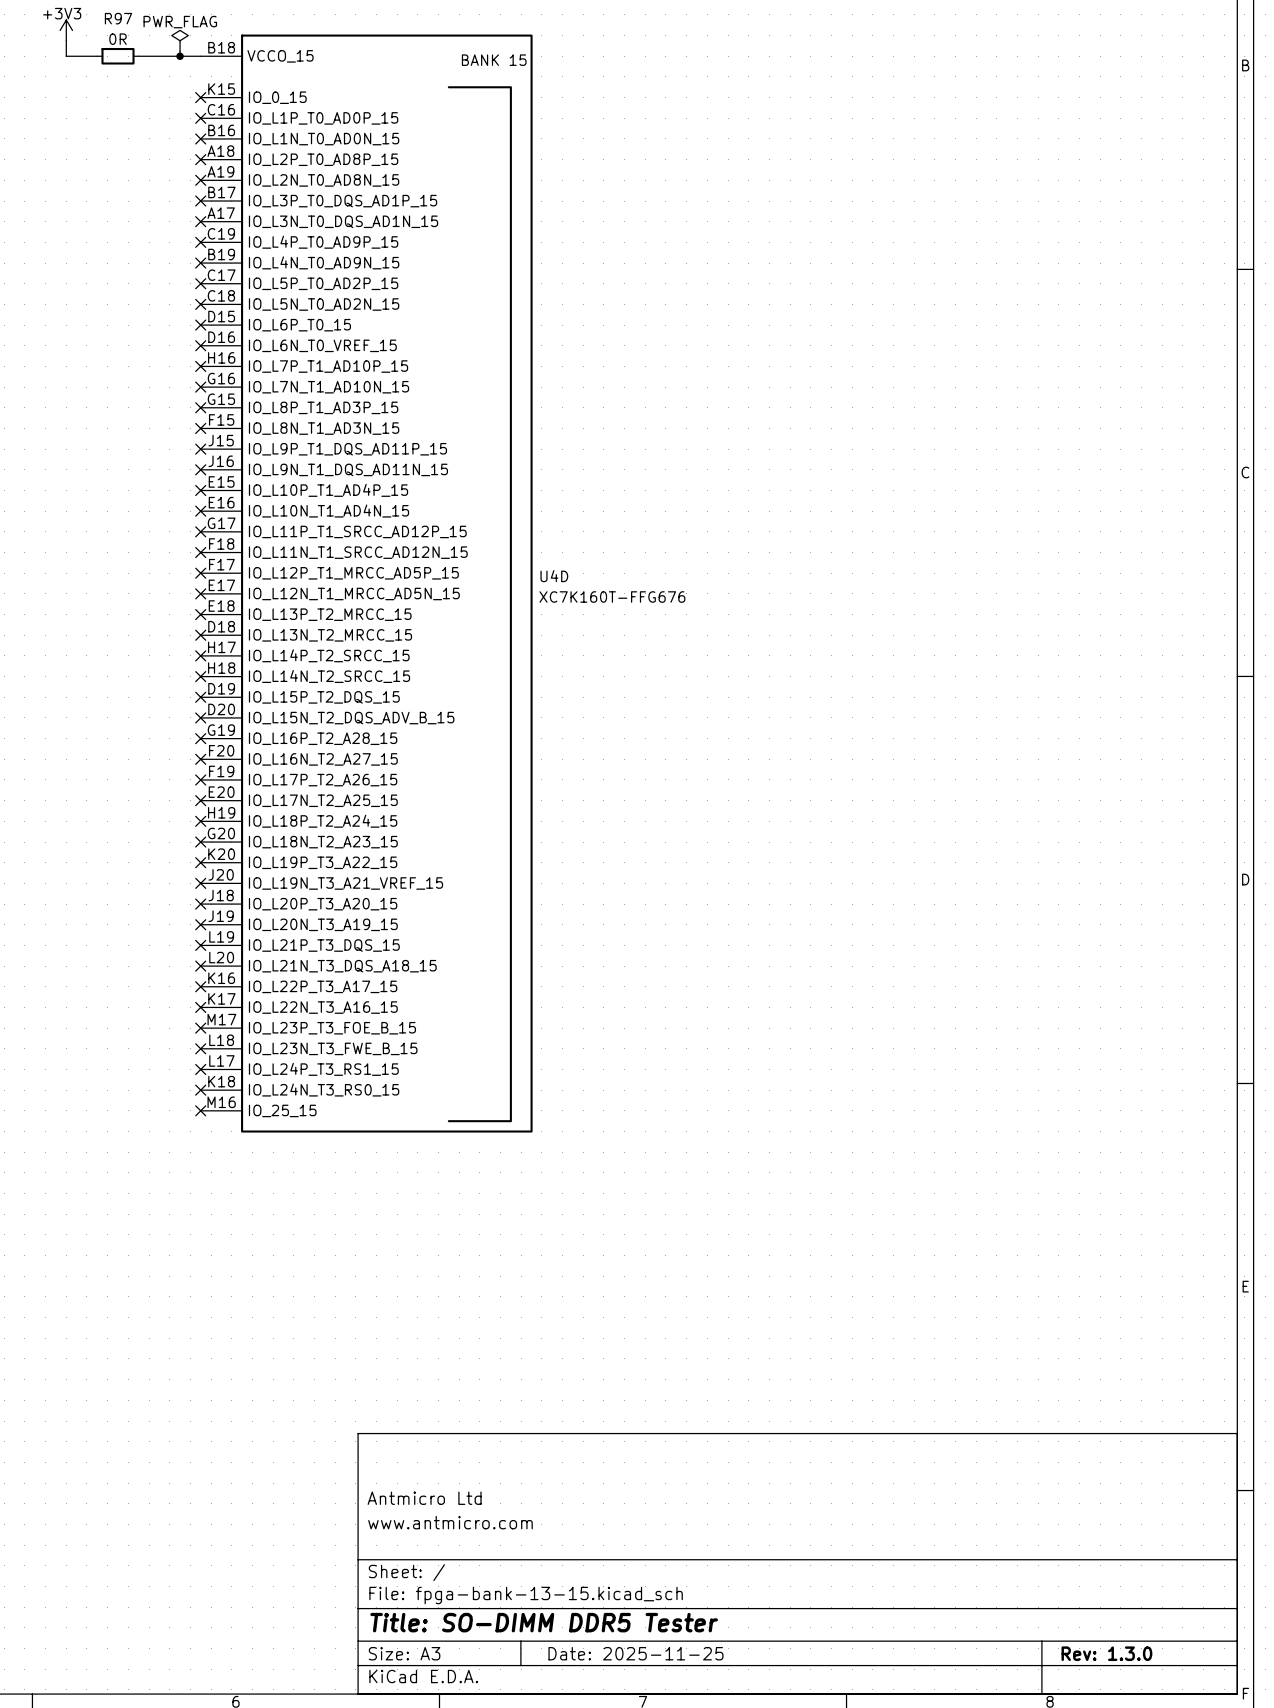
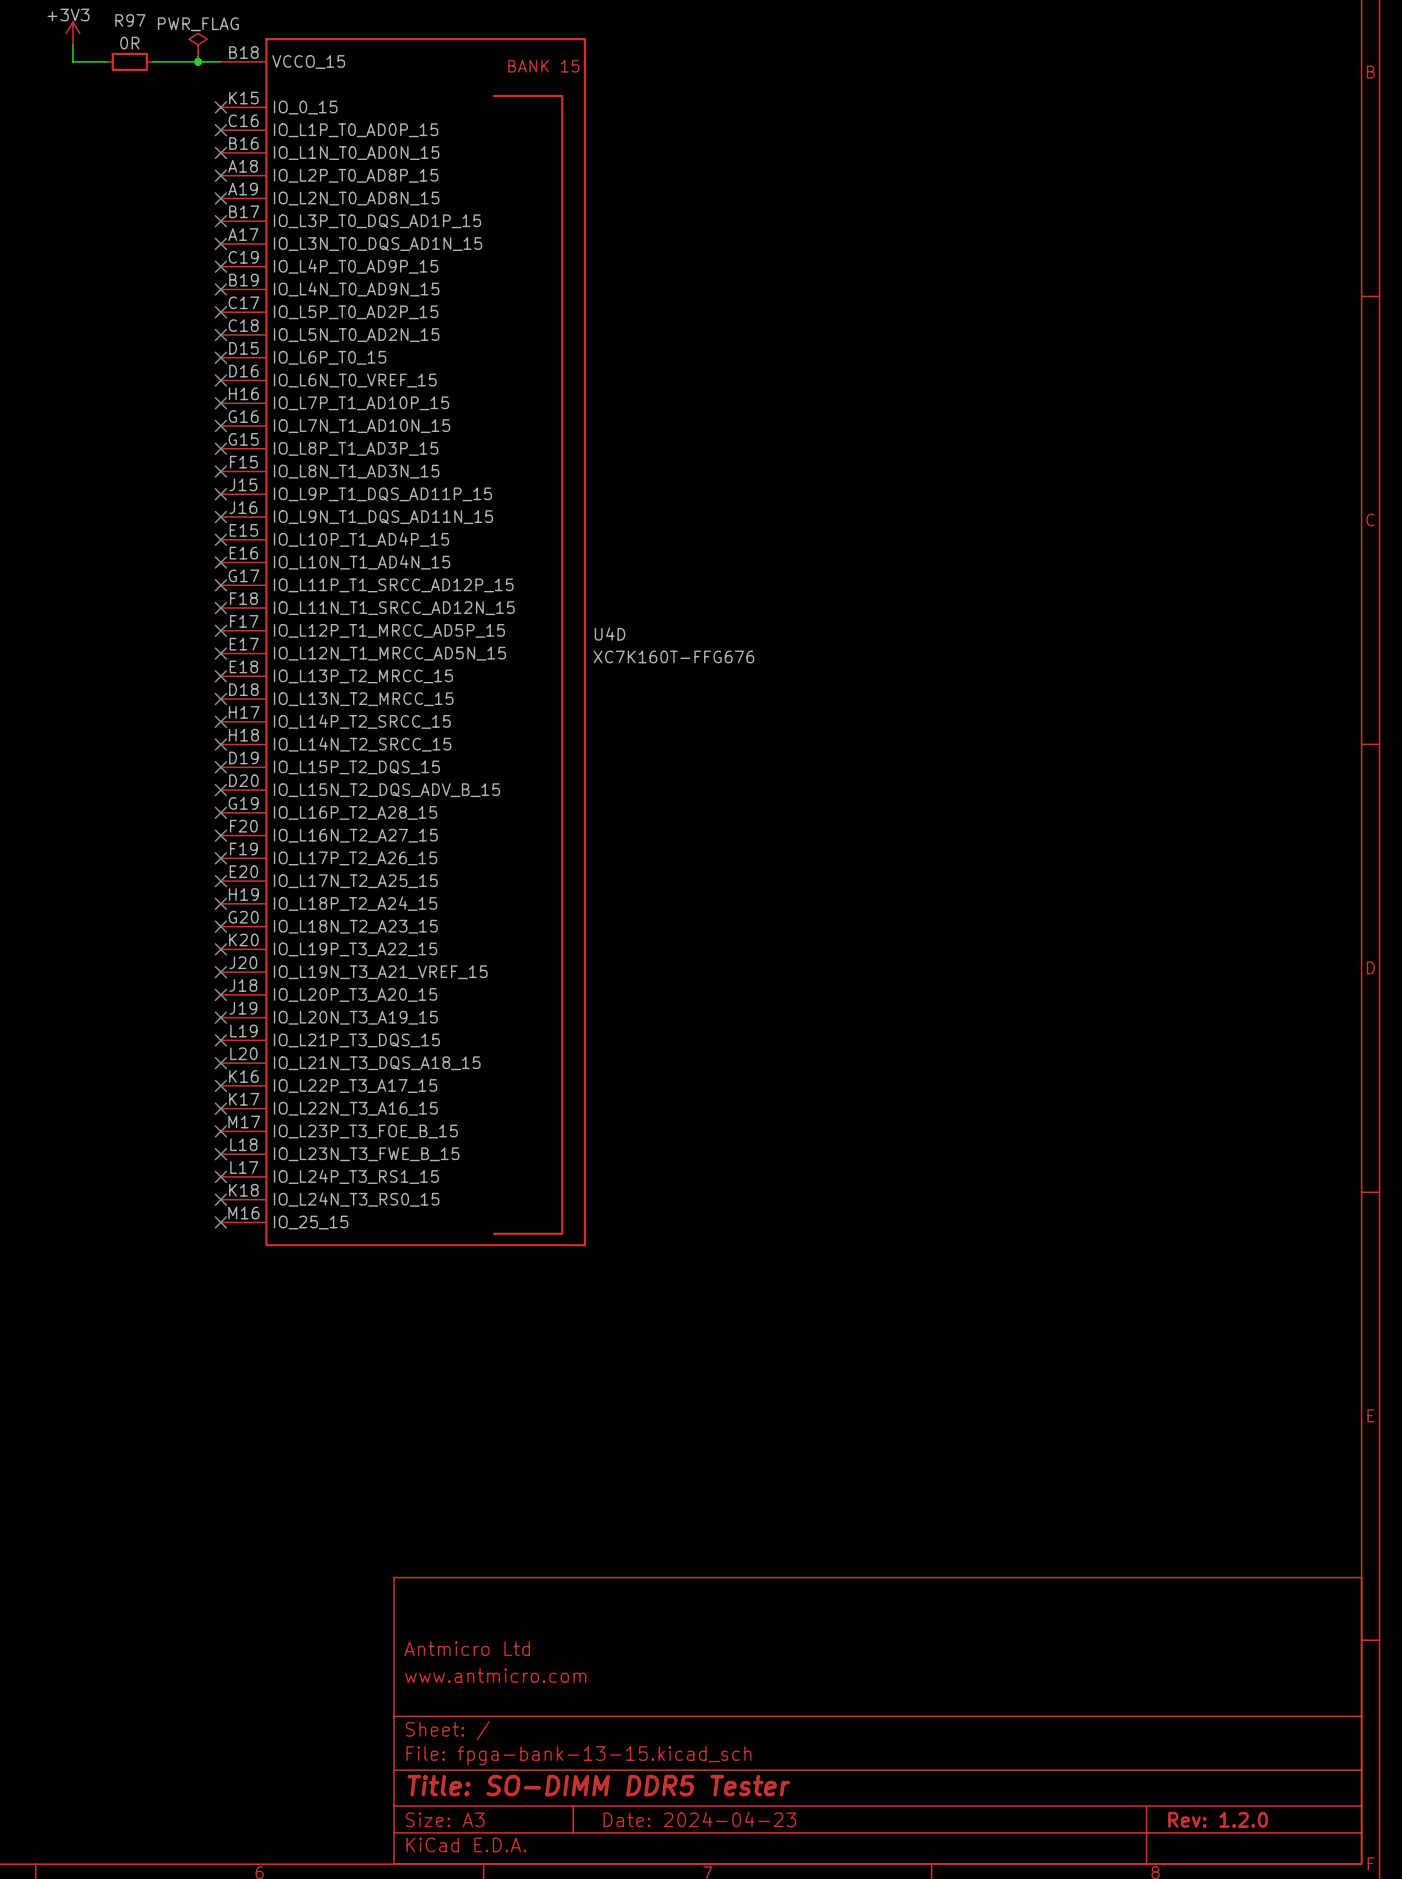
title block: Date: 2025-11-25 (635, 1653) -> Date: 2024-04-23 (699, 1819)
title block: Rev: 1.3.0 (1106, 1653) -> Rev: 1.2.0 (1218, 1819)

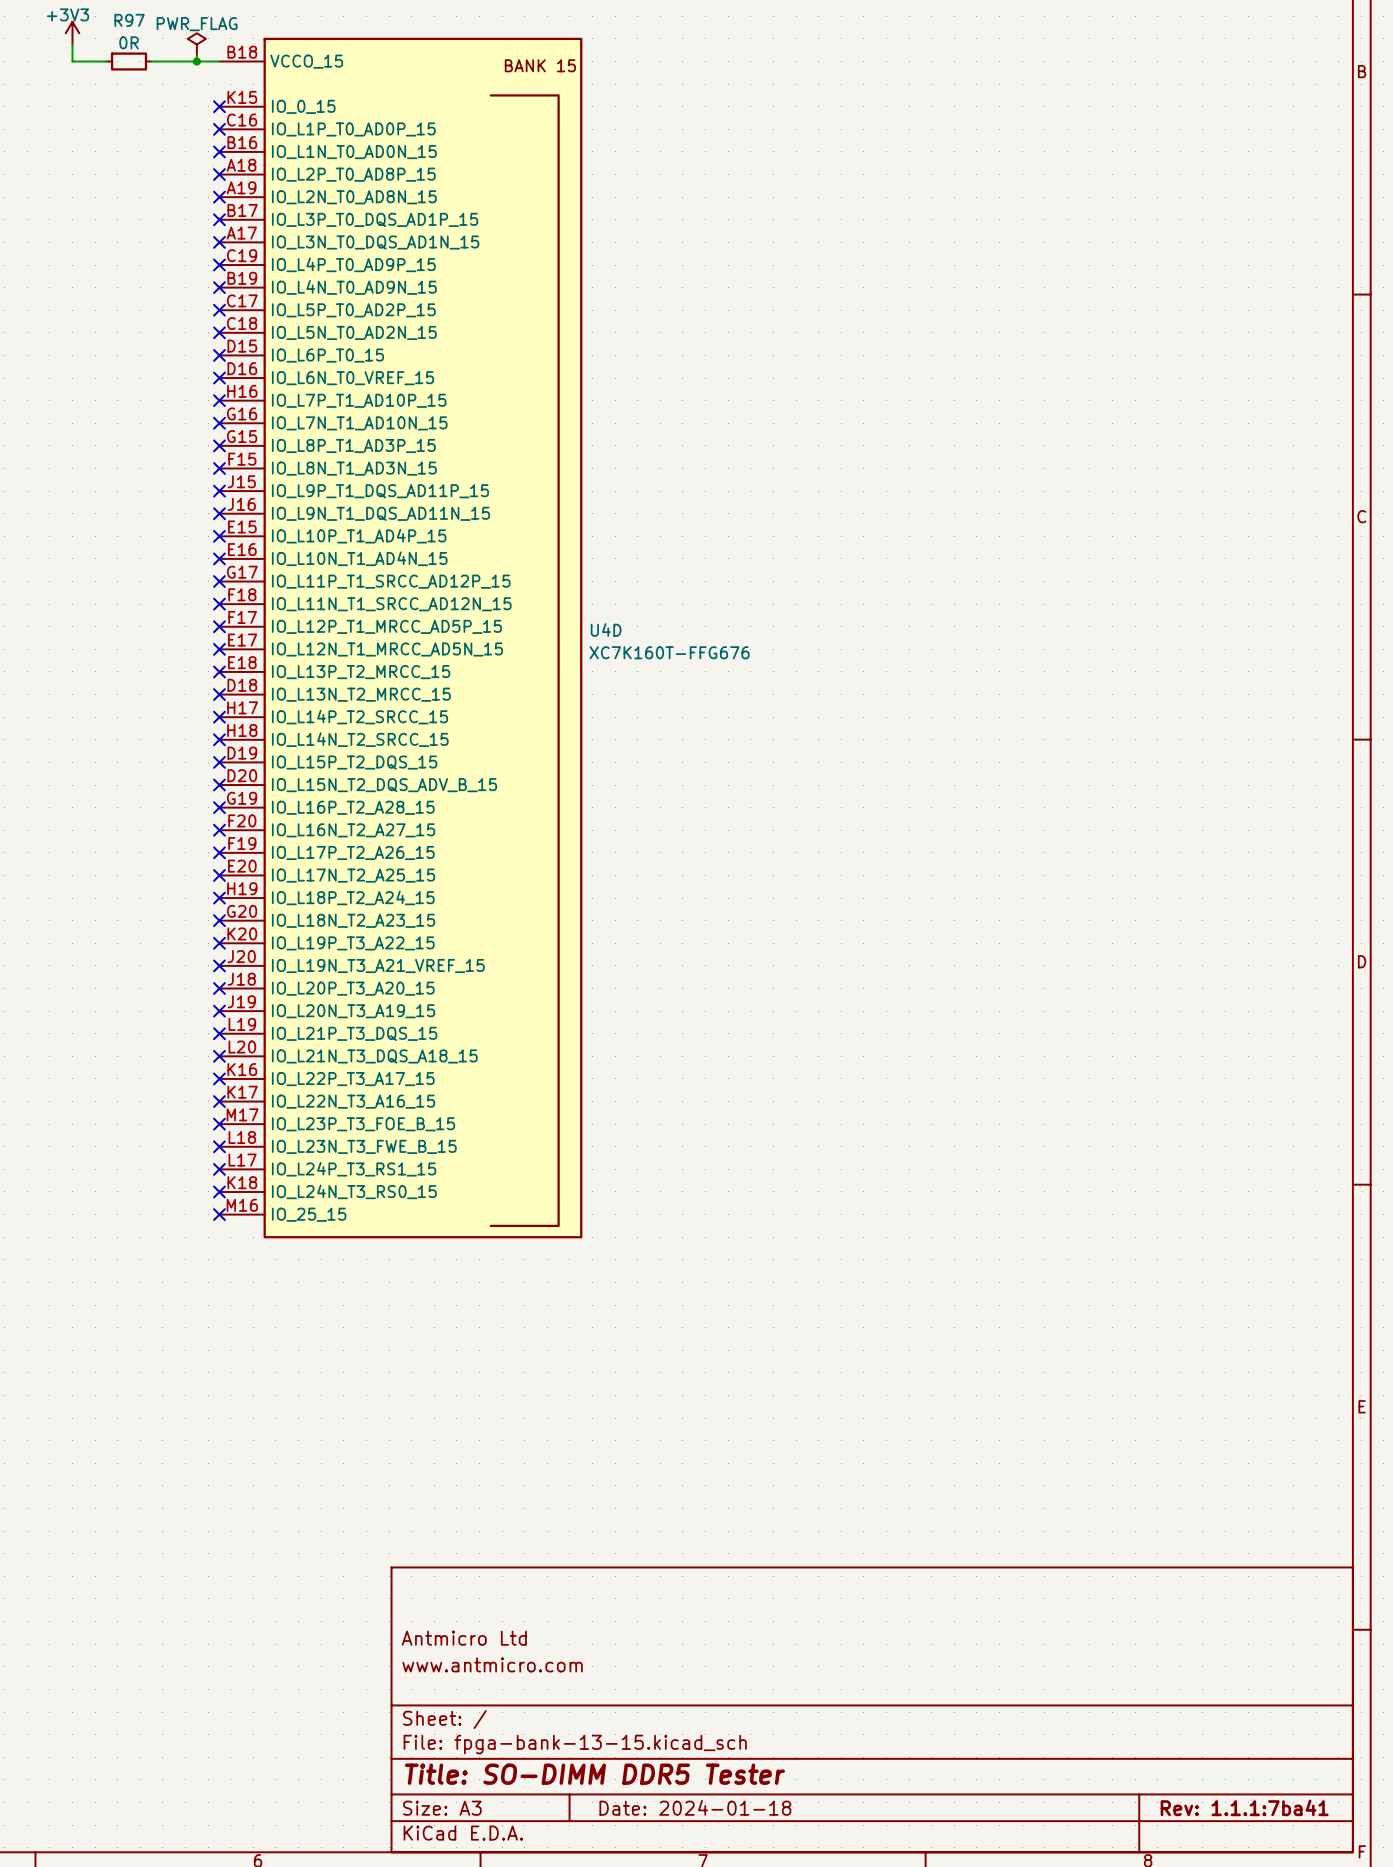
title block: Date: 2024-04-23 (699, 1819) -> Date: 2024-01-18 (695, 1807)
title block: Rev: 1.2.0 (1218, 1819) -> Rev: 1.1.1:7ba41 (1244, 1807)

